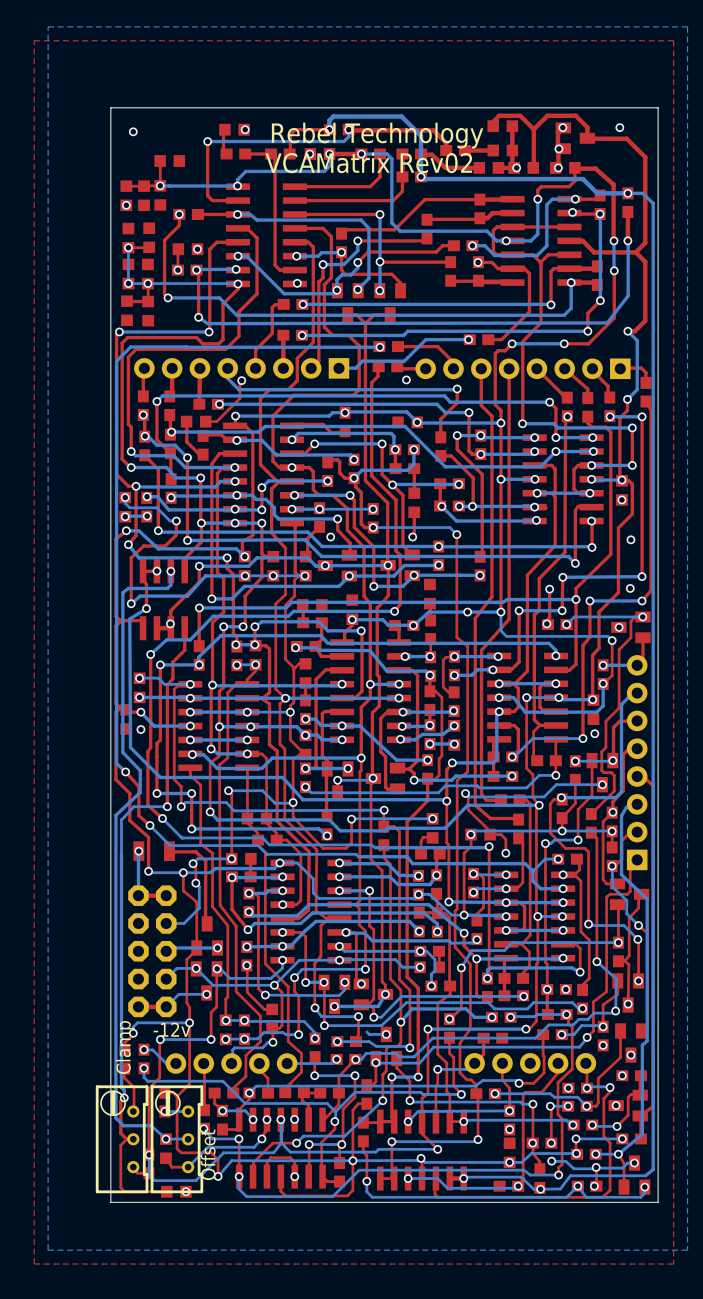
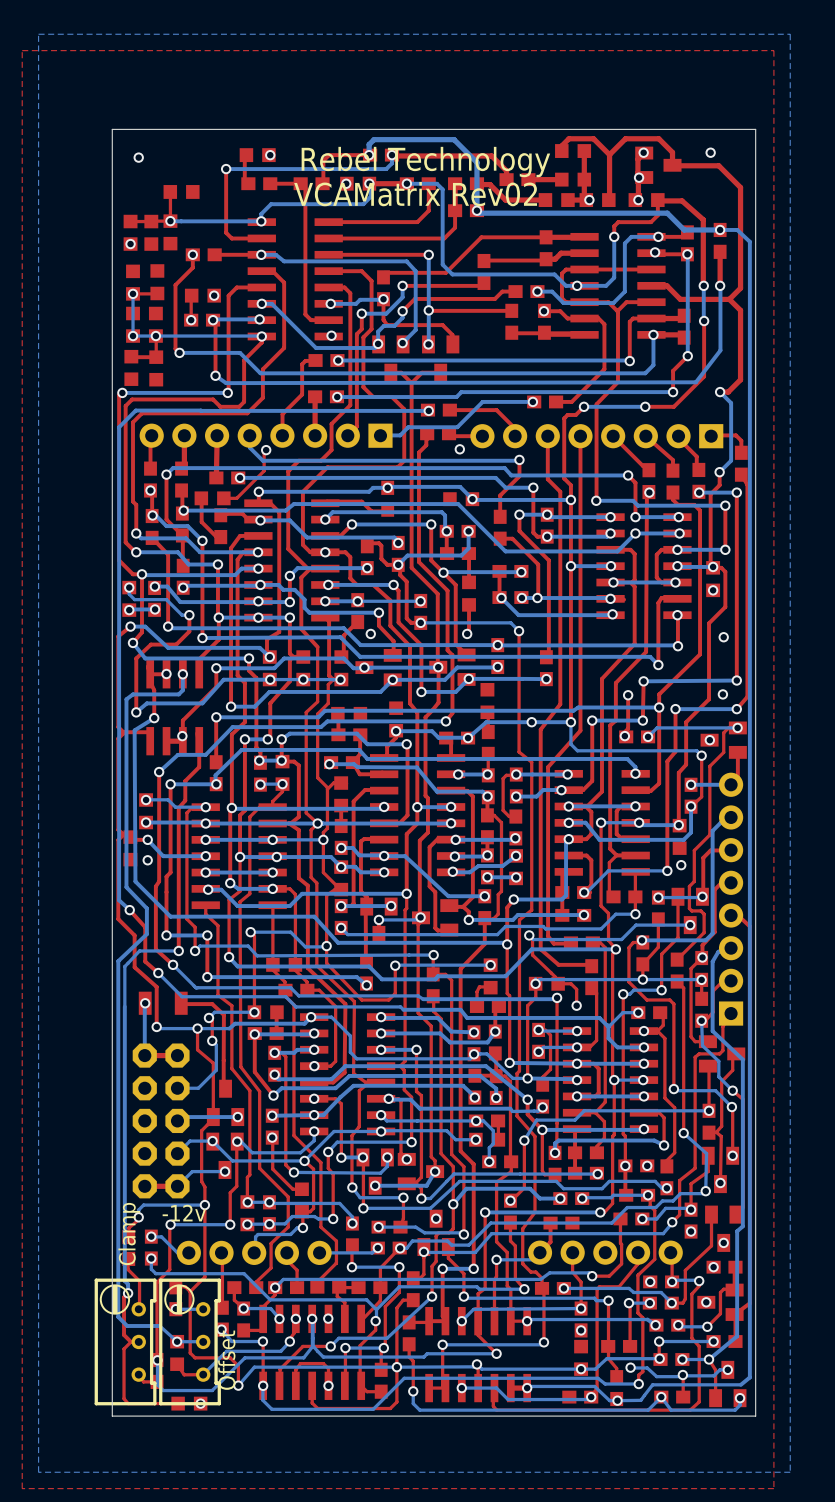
bottom track: (366, 1031) (369, 1034) (386, 1034) -> none
via: (532, 1143) -> none
via: (551, 1143) -> none
via: (594, 1186) -> none

